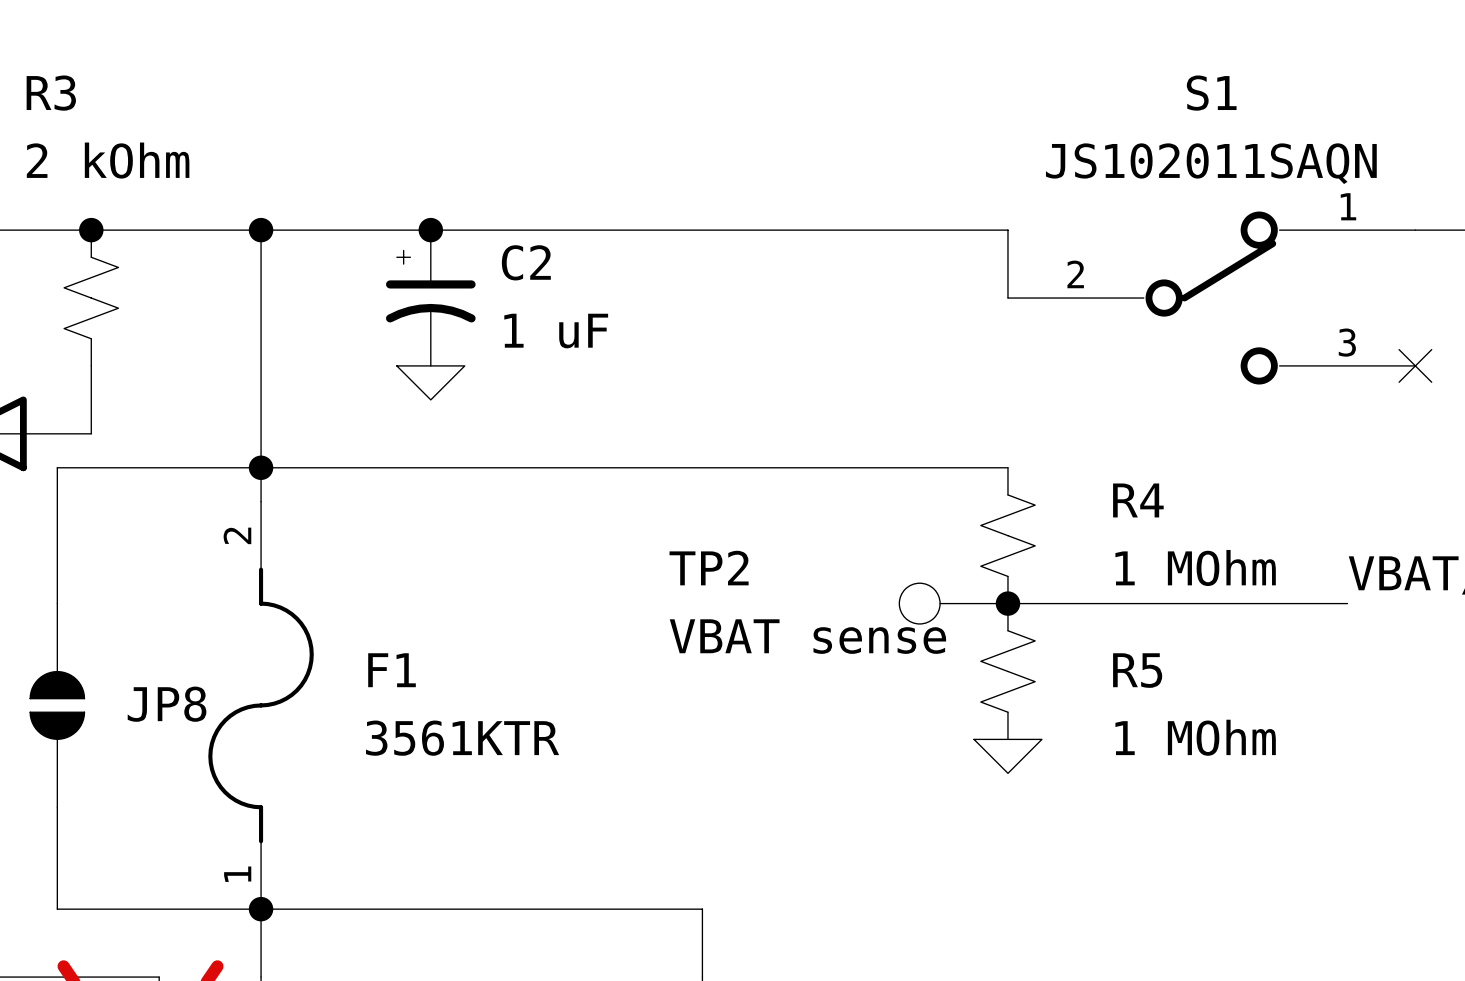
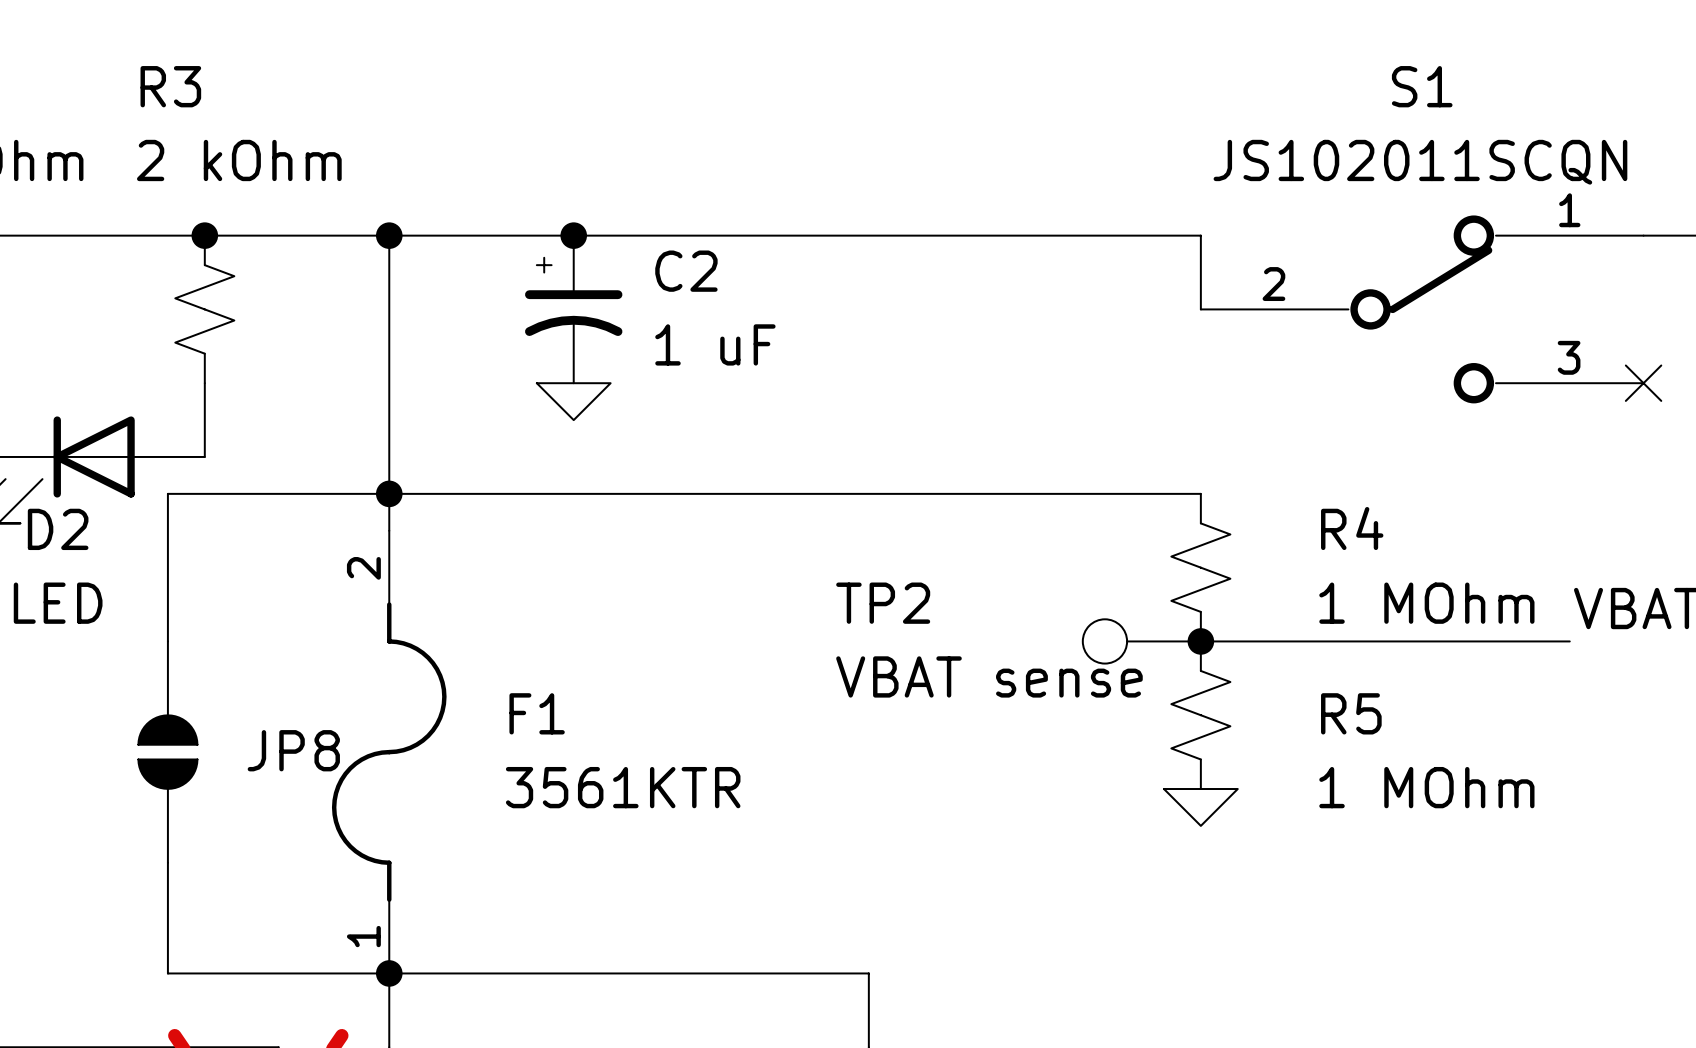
S1 value: JS102011SAQN (1211, 163) -> JS102011SCQN (1420, 162)

